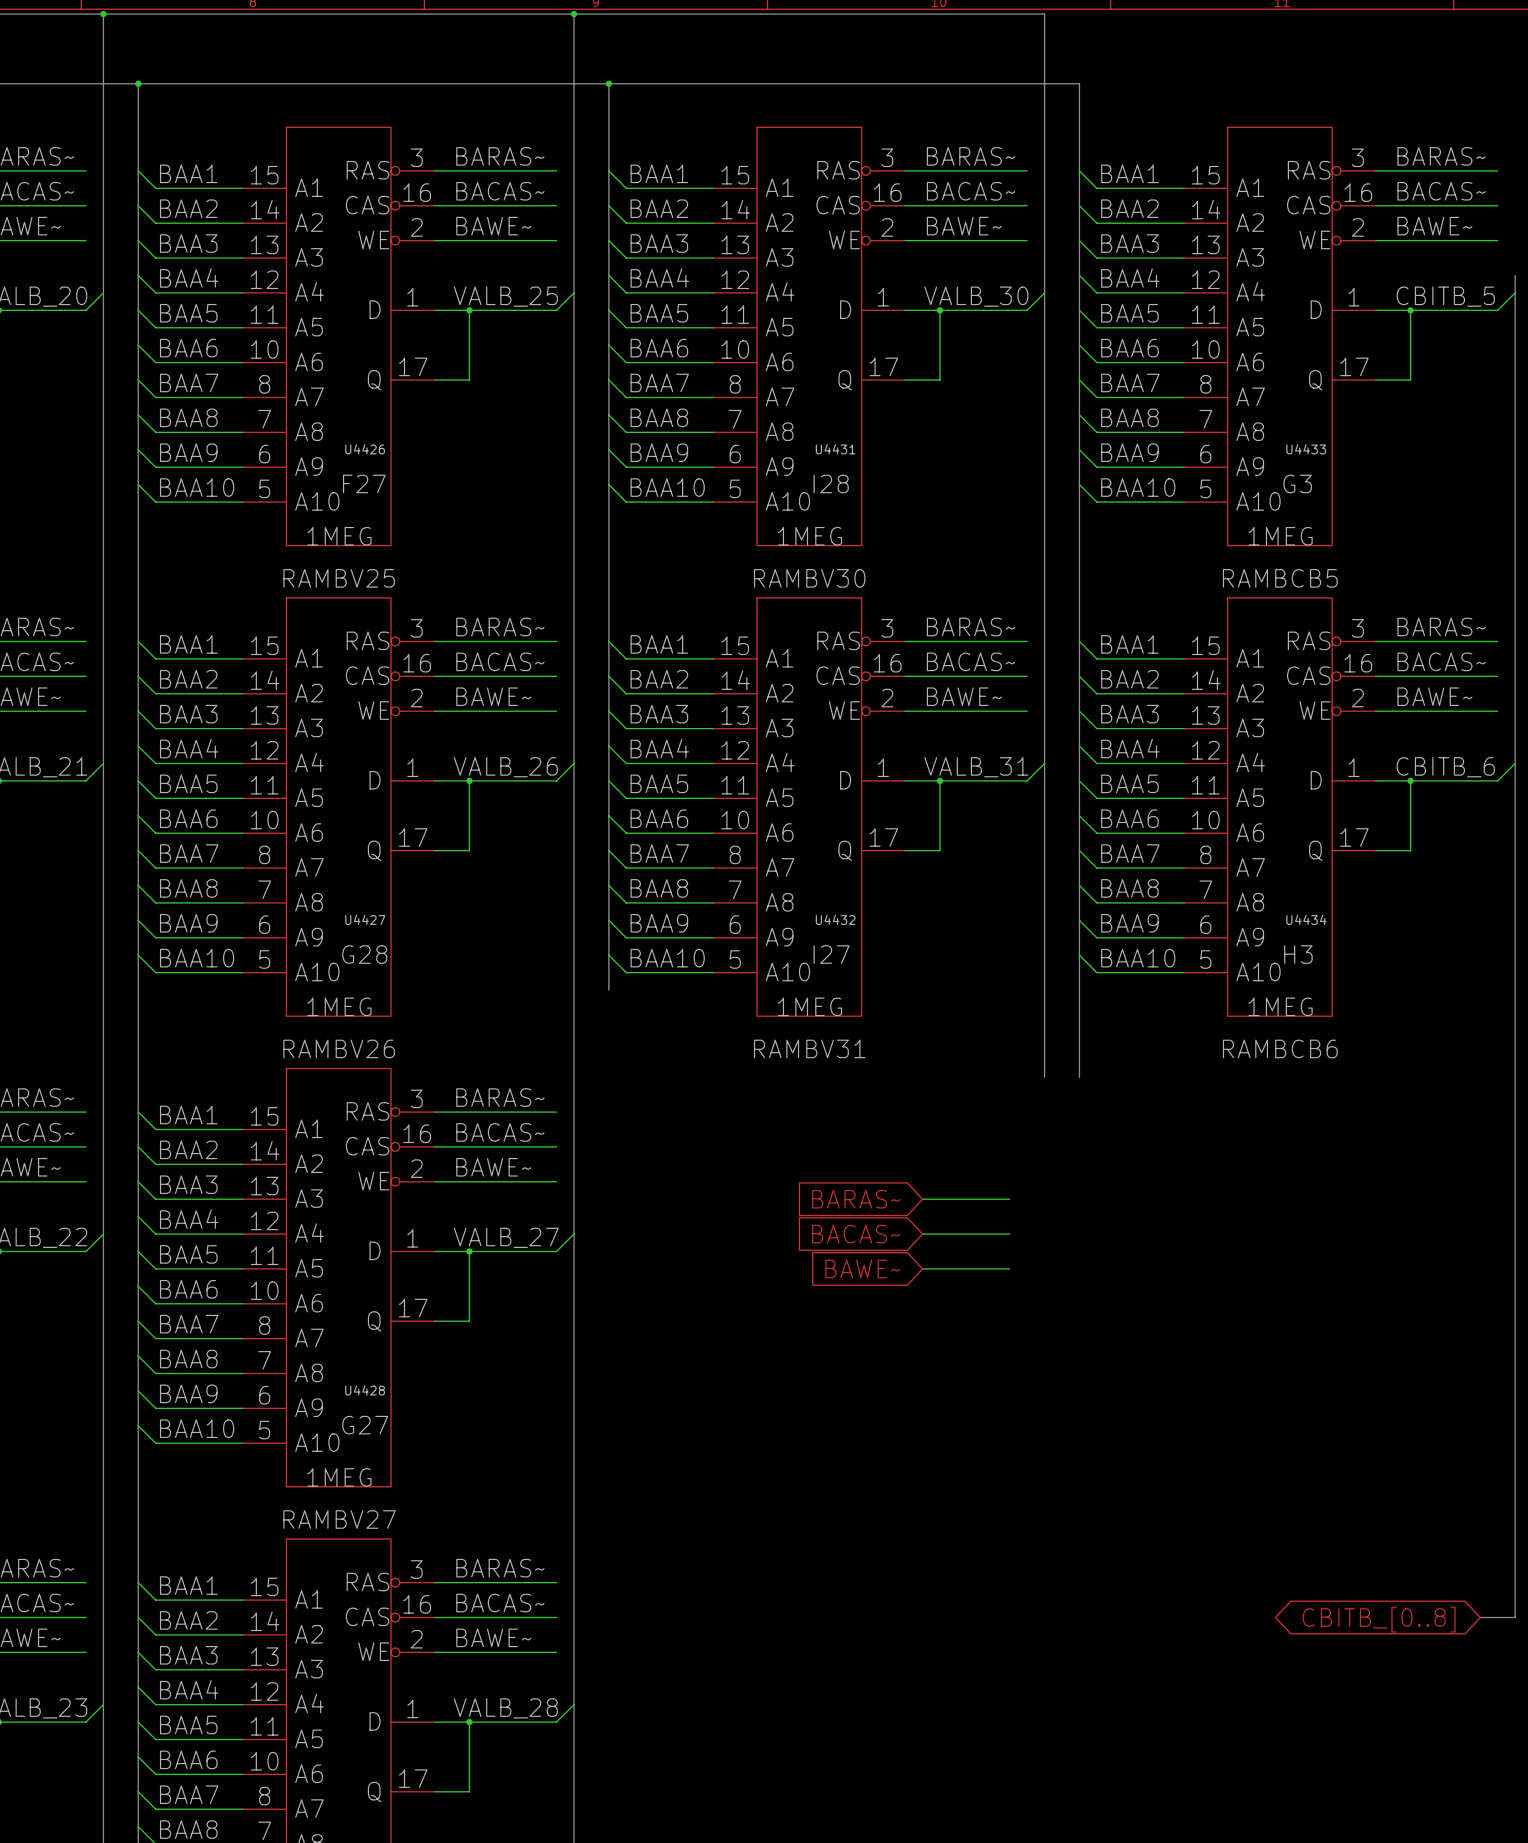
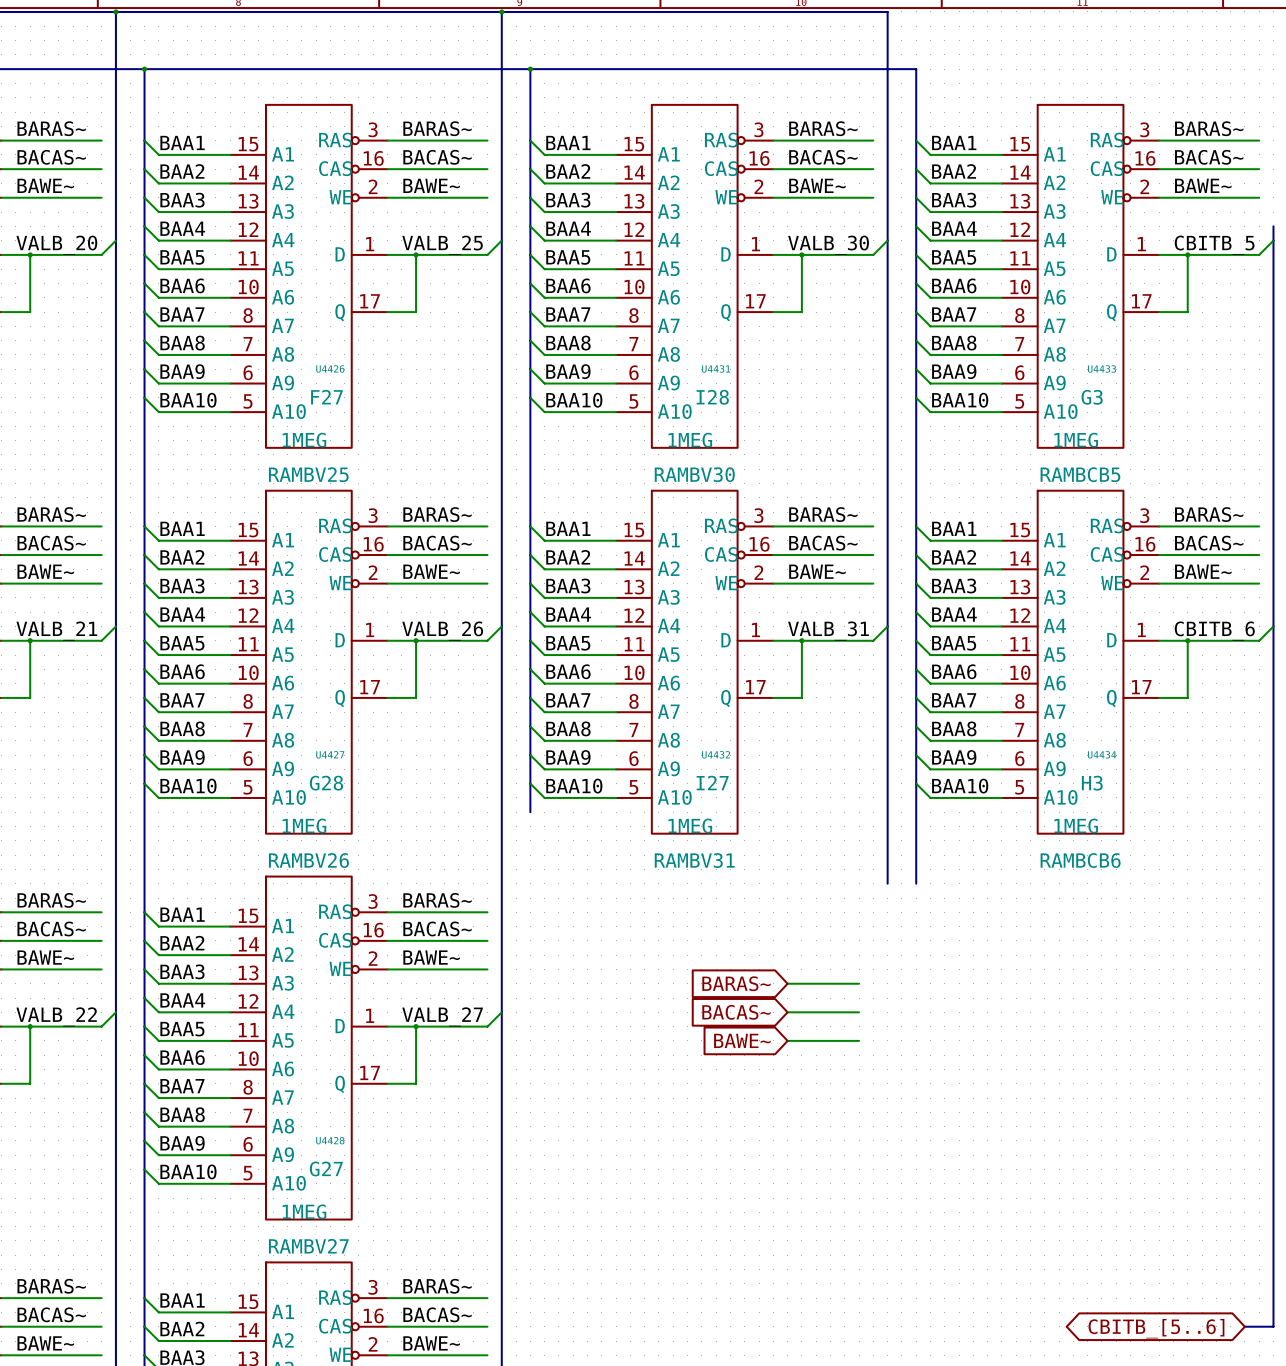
global label: CBITB_[0..8] (1379, 1619) -> CBITB_[5..6] (1156, 1328)

